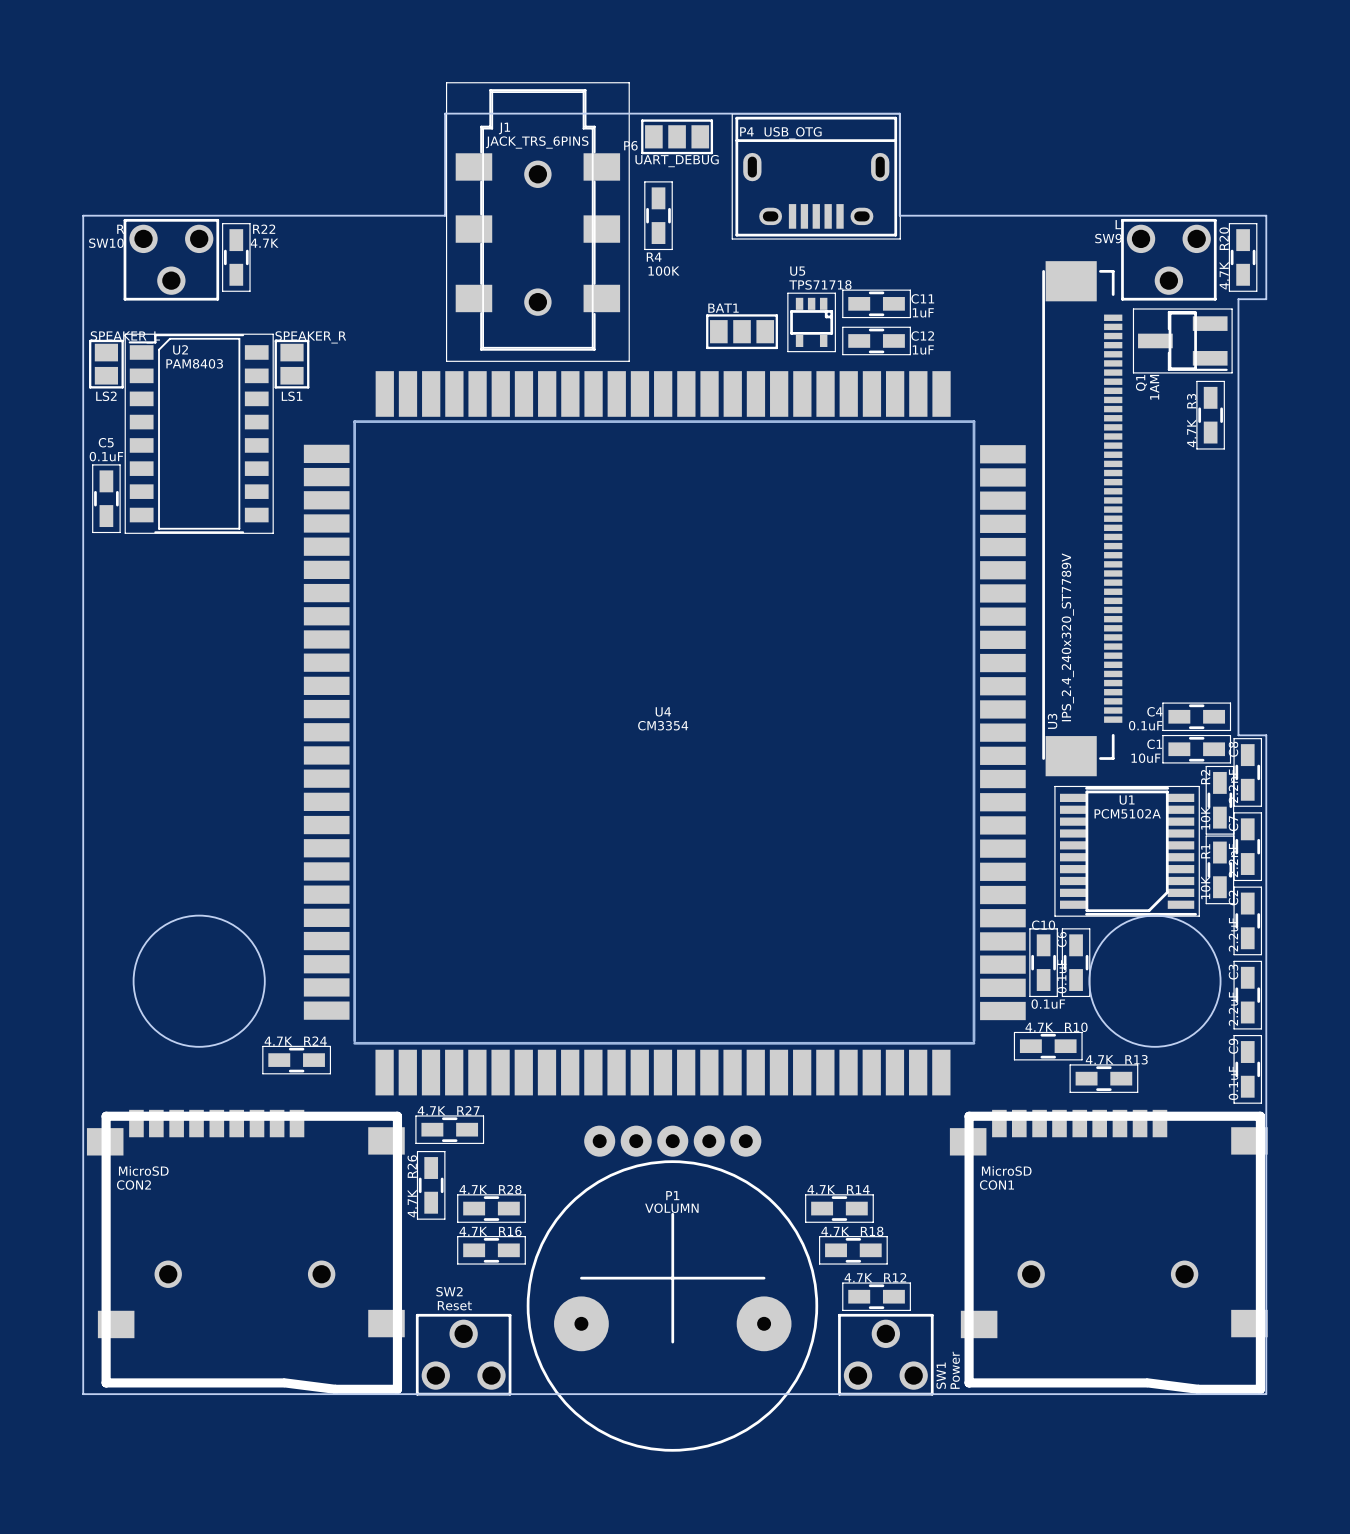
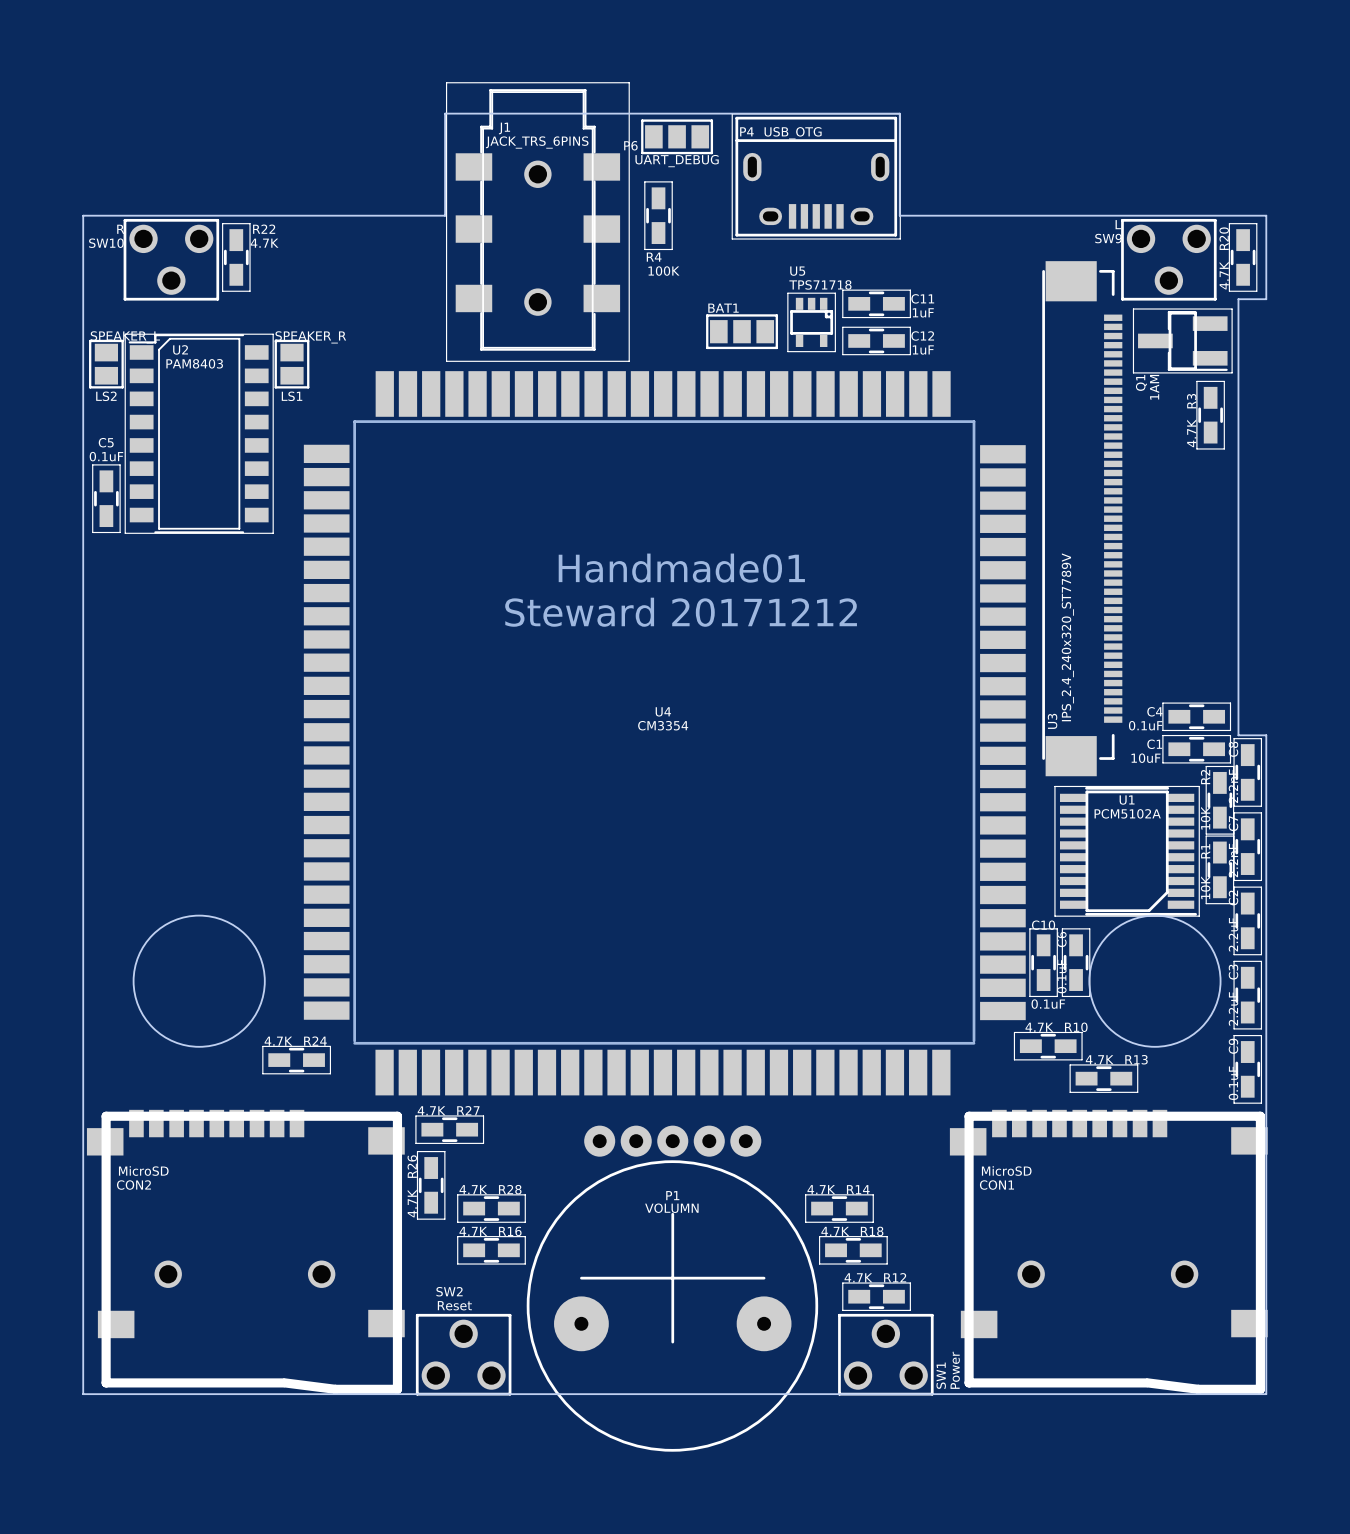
text: none -> Handmade01 (681, 568)
text: none -> Steward 20171212 (681, 612)

